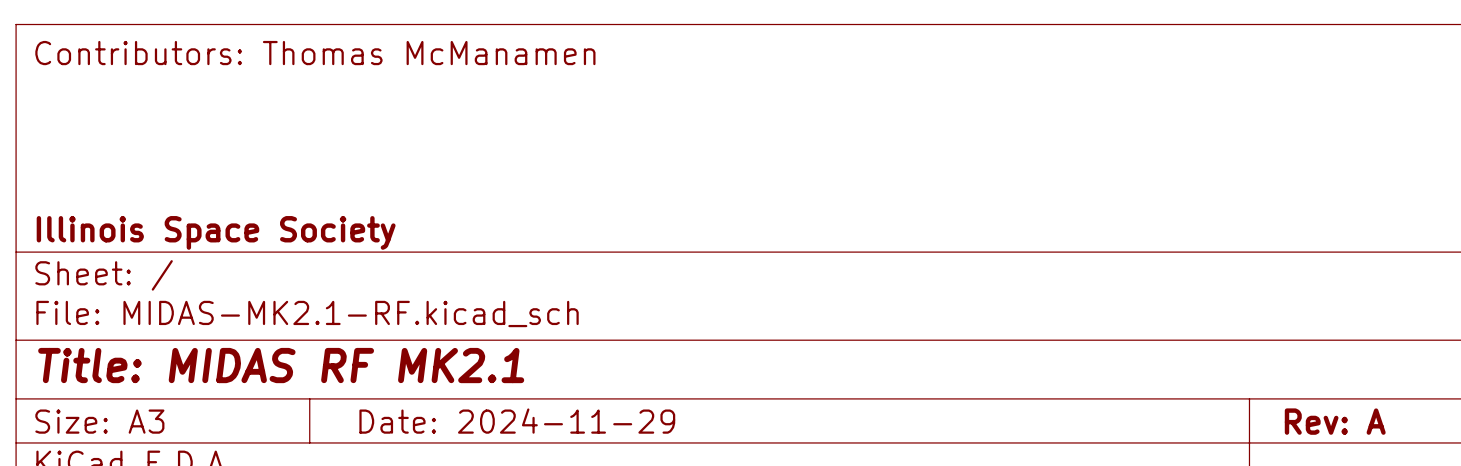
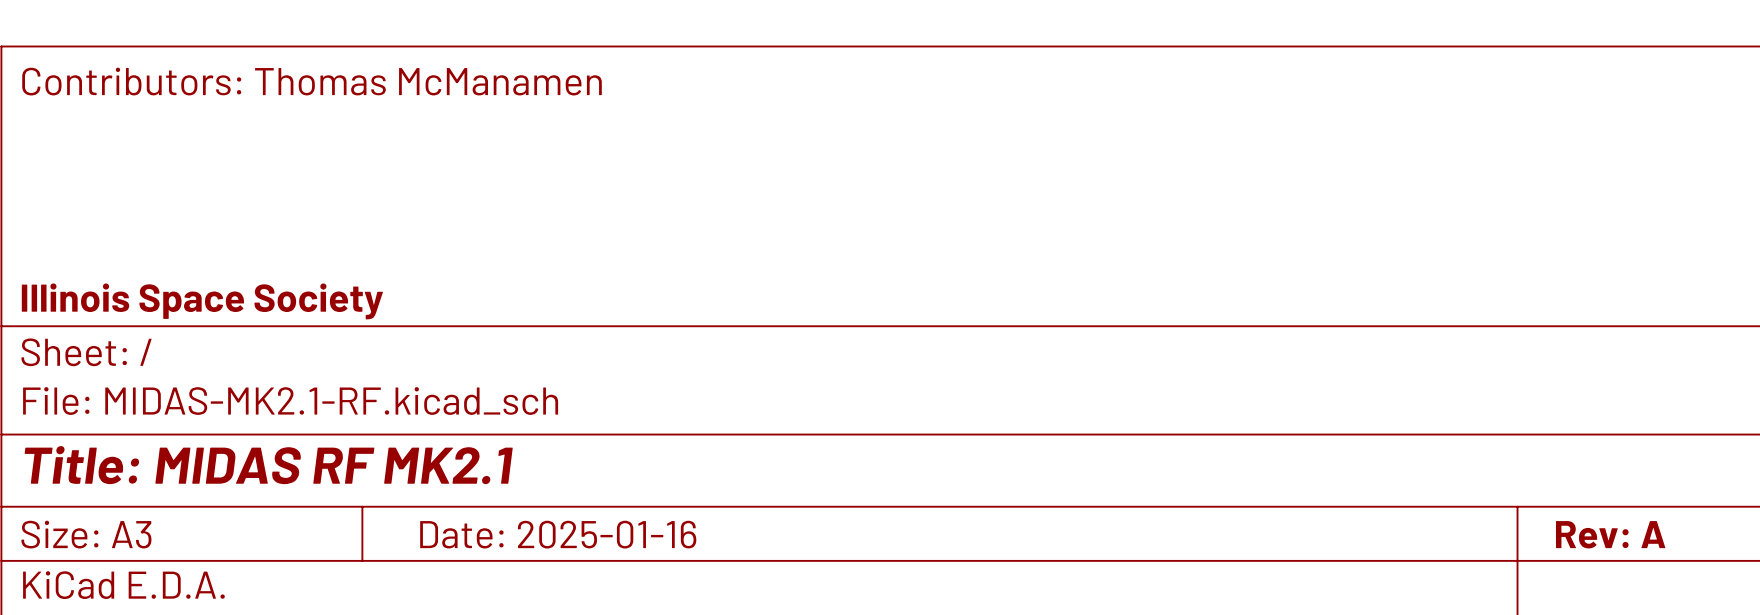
title block: Date: 2024-11-29 (517, 421) -> Date: 2025-01-16 (558, 534)

